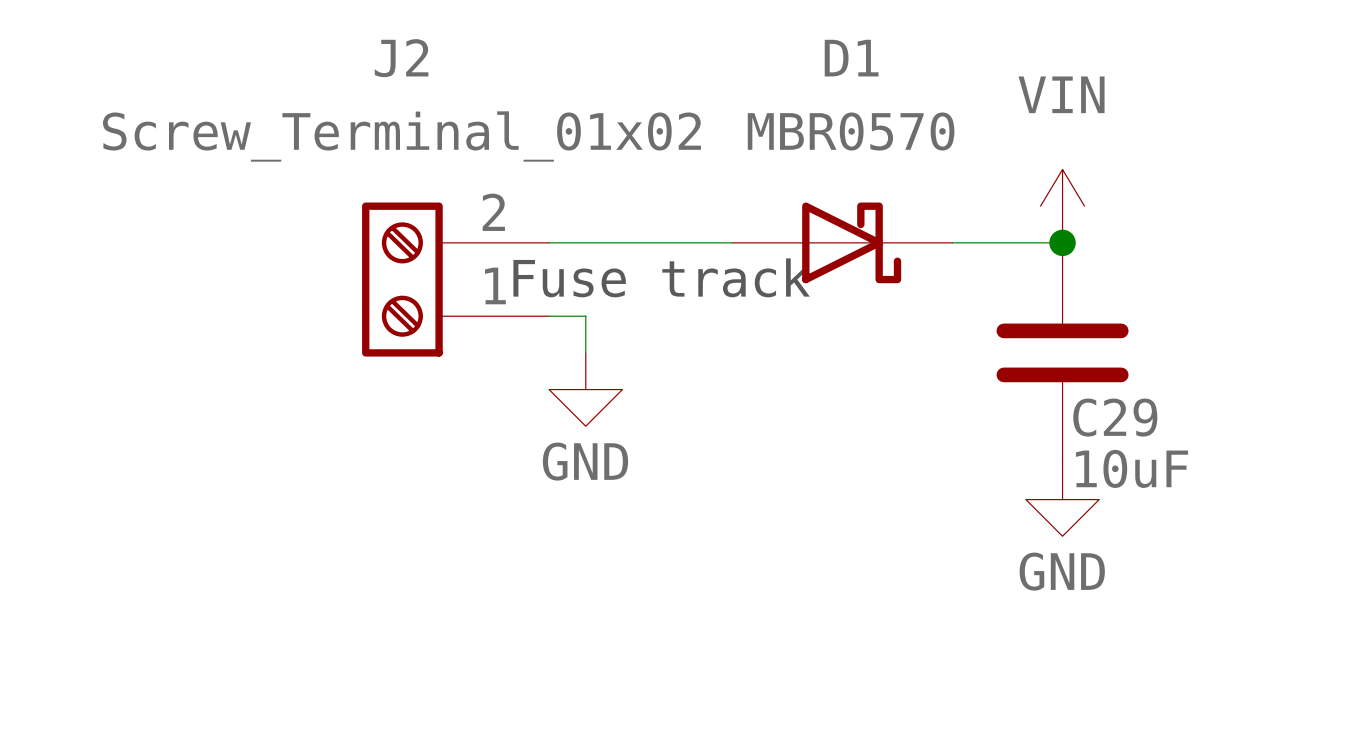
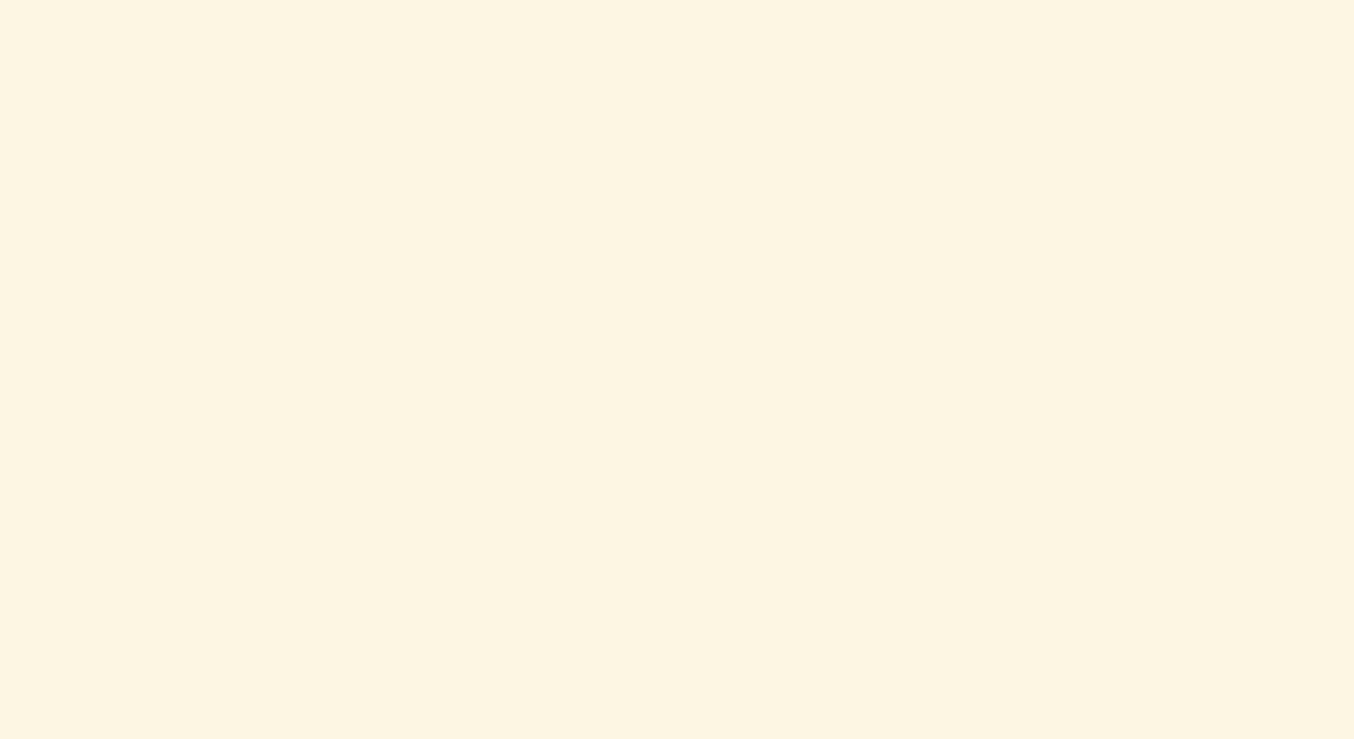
power symbol: VIN (1062, 206) -> none
wire: (549, 242) (732, 242) -> none
D1: MBR0570 (842, 242) -> none
wire: (952, 242) (1062, 242) -> none
junction: (1062, 242) -> none
text: Fuse track (661, 277) -> none
J2: Screw_Terminal_01x02 (455, 279) -> none
wire: (549, 316) (585, 316) (585, 352) -> none
C29: 10uF (1062, 352) -> none
power symbol: GND (585, 389) -> none
power symbol: GND (1062, 499) -> none

